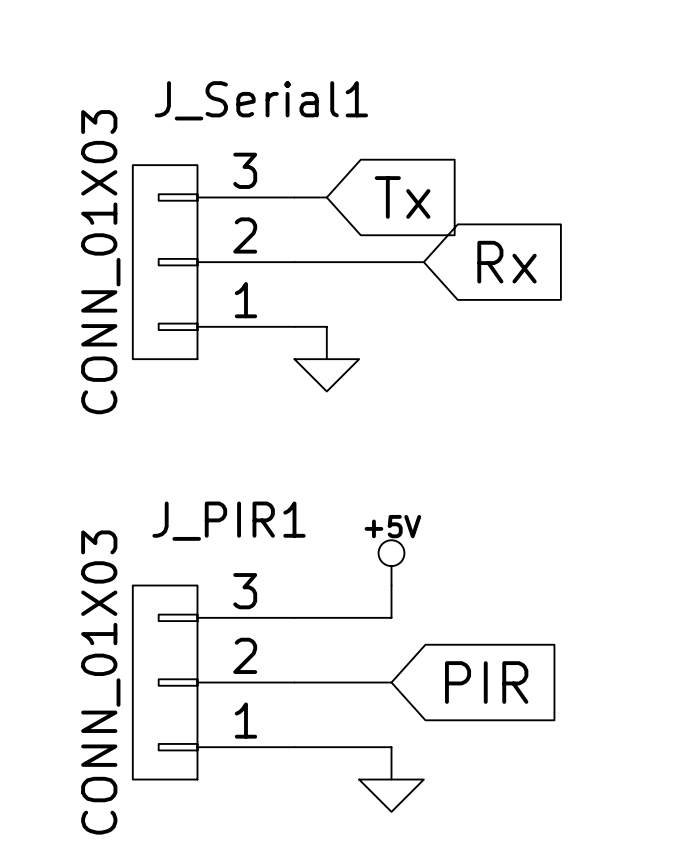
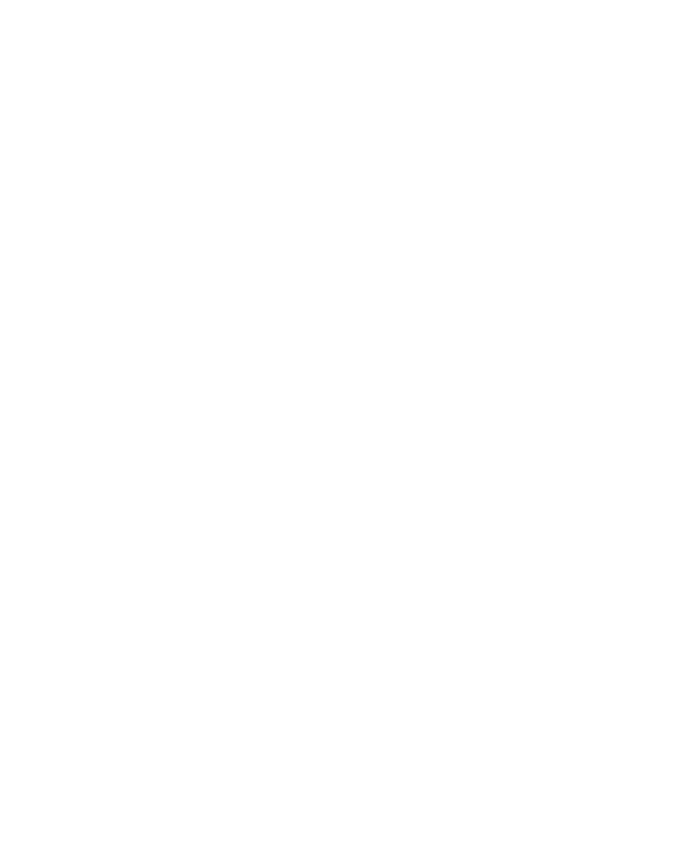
wire: (294, 197) (326, 197) -> none
global label: Tx (402, 197) -> none
J_Serial1: CONN_01X03 (213, 262) -> none
wire: (294, 262) (423, 262) -> none
global label: Rx (506, 262) -> none
wire: (294, 326) (326, 326) (326, 359) -> none
power symbol: (326, 375) -> none
power symbol: +5V (391, 562) -> none
wire: (391, 585) (391, 617) (294, 617) -> none
J_PIR1: CONN_01X03 (213, 682) -> none
wire: (294, 682) (391, 682) -> none
global label: PIR (486, 682) -> none
wire: (294, 747) (391, 747) (391, 779) -> none
power symbol: (391, 795) -> none

